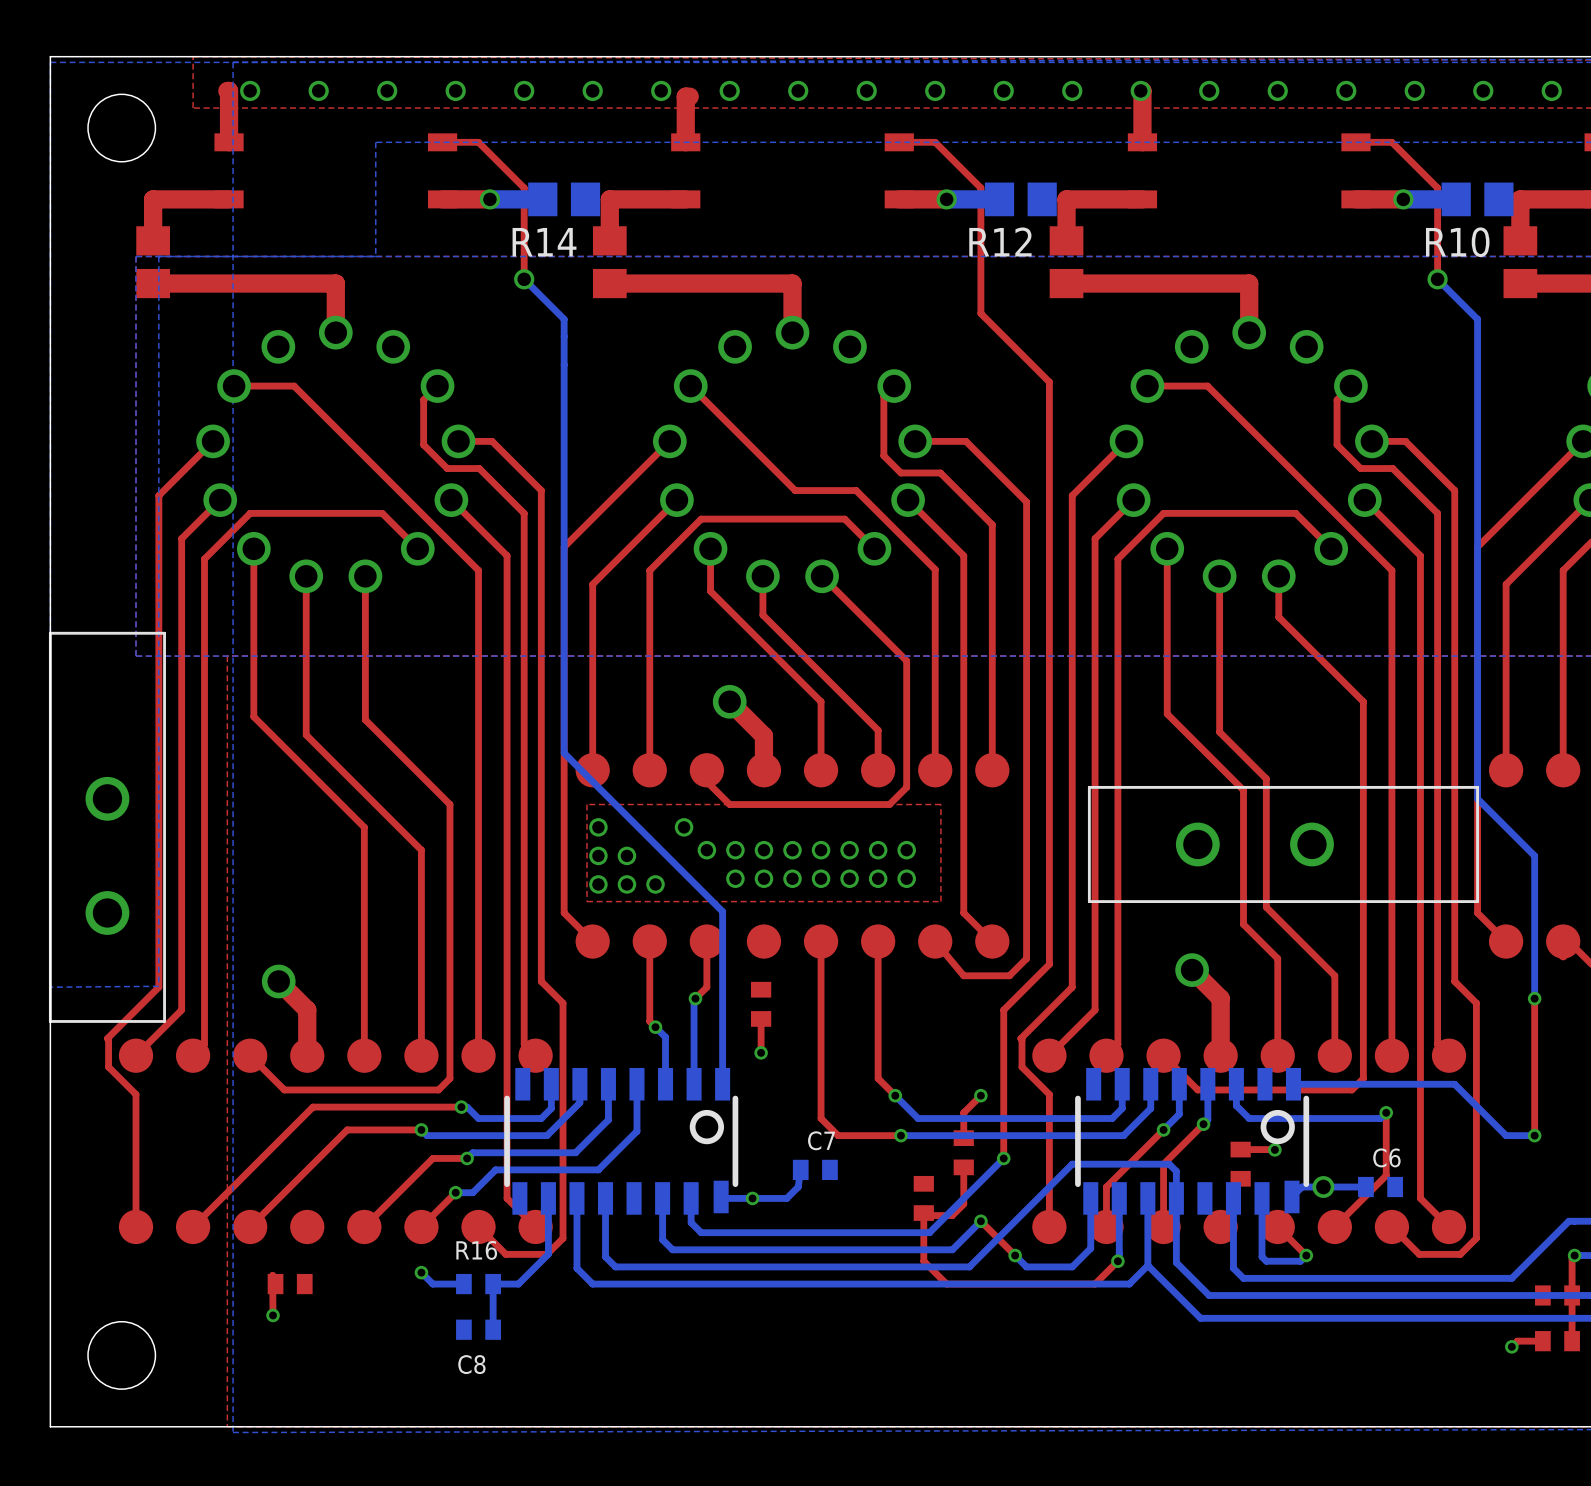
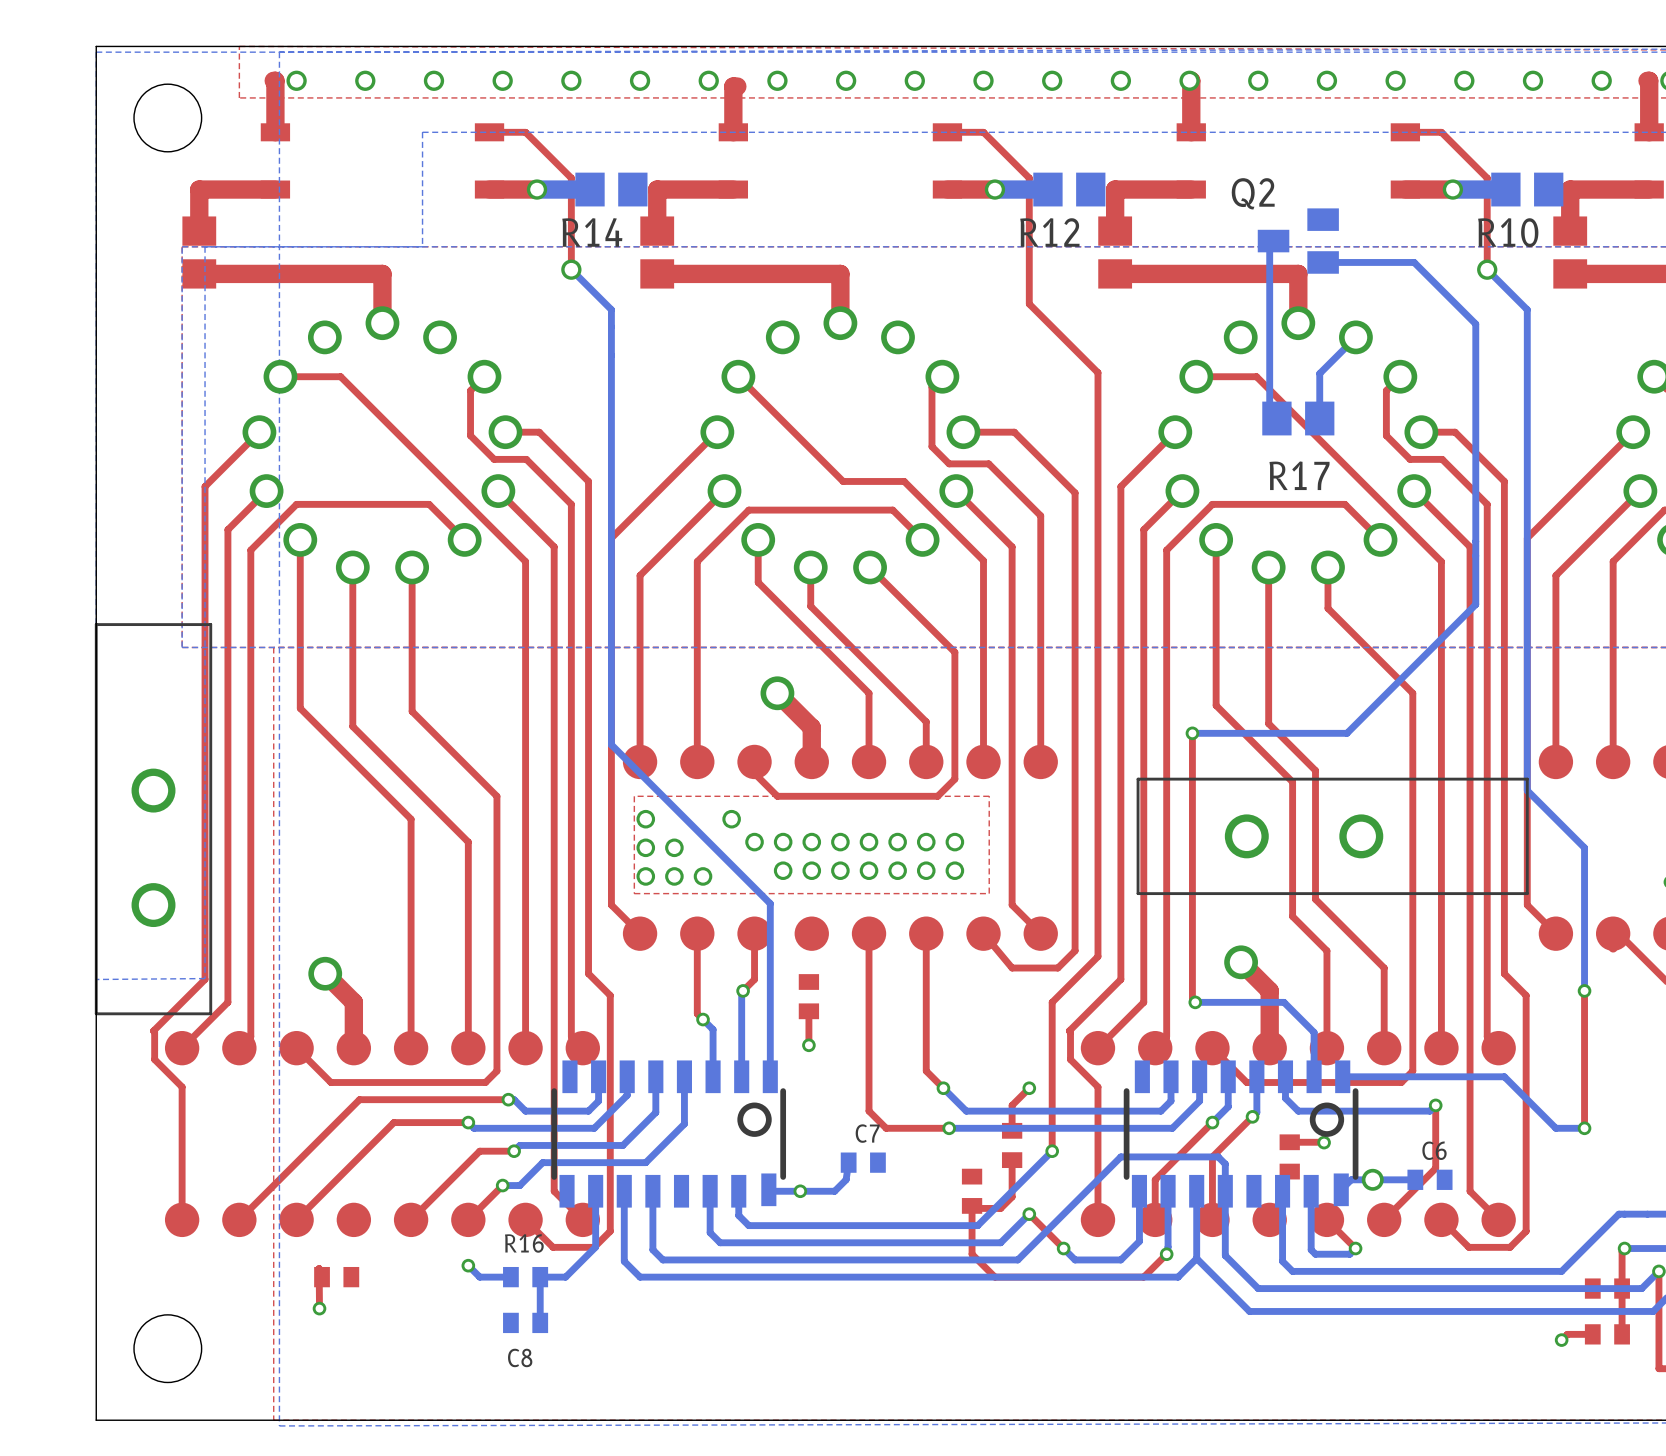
bottom track: none -> (1273, 241) (1269, 241) (1269, 418) (1276, 418)
Q2: none -> (1298, 241)
bottom track: none -> (1323, 262) (1414, 262) (1475, 324) (1475, 604) (1346, 733) (1192, 733)
bottom track: none -> (1355, 337) (1319, 373) (1319, 418)
R17: none -> (1298, 418)
top track: none -> (1192, 733) (1192, 999) (1195, 1002)
via: none -> (1192, 733)
bottom track: none -> (1195, 1002) (1284, 1002) (1314, 1032) (1314, 1076)
via: none -> (1195, 1002)

